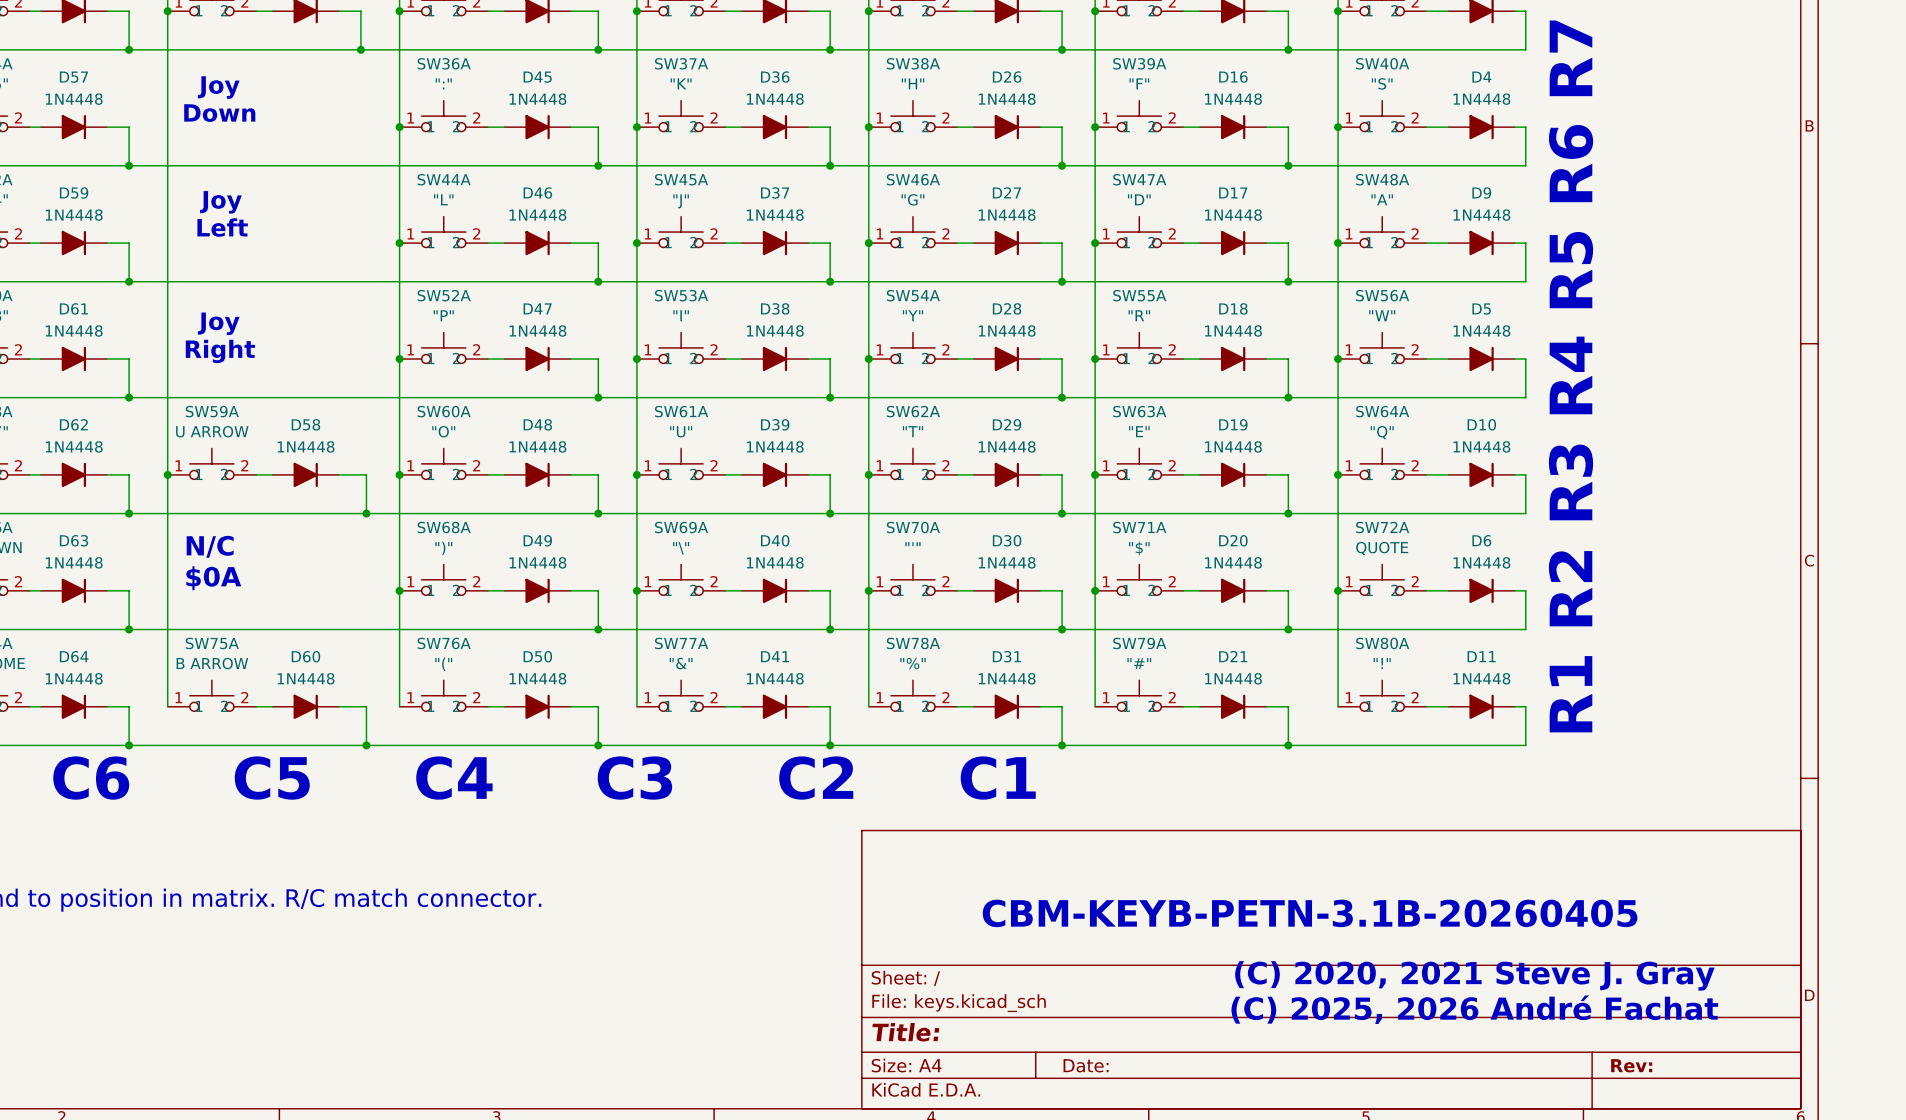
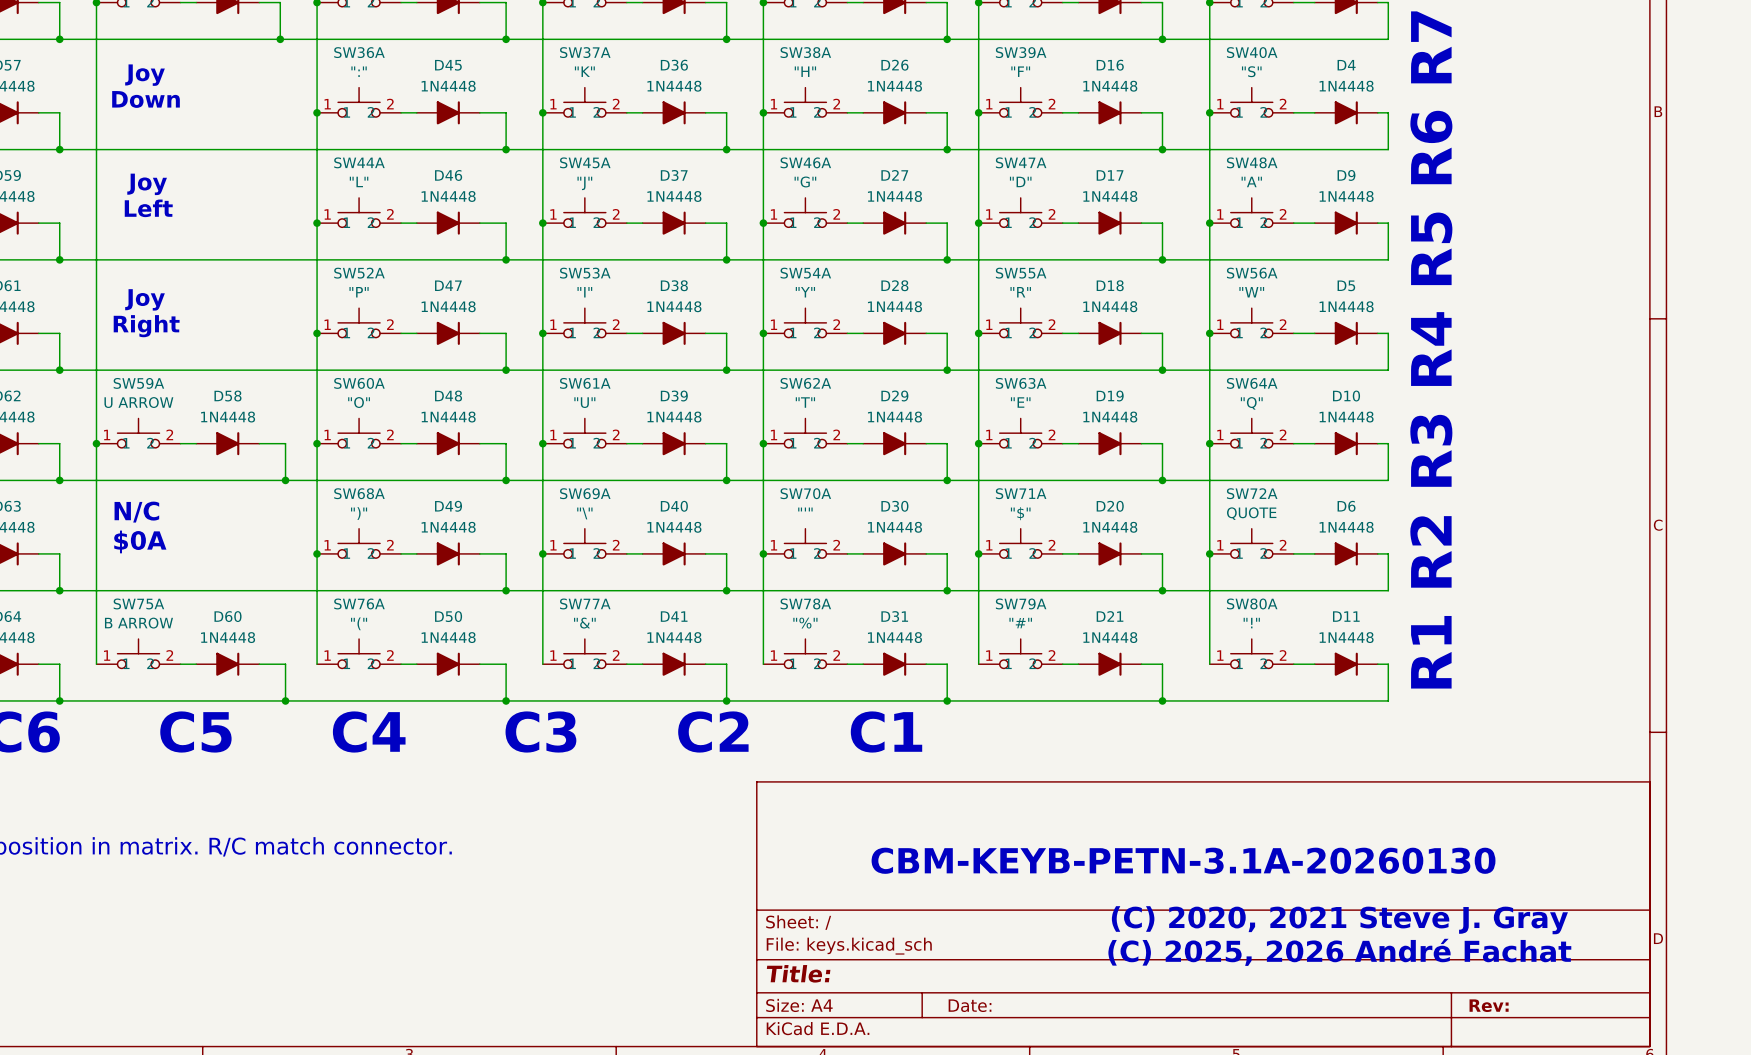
text: CBM-KEYB-PETN-3.1B-20260405 (1310, 913) -> CBM-KEYB-PETN-3.1A-20260130 (1183, 860)

